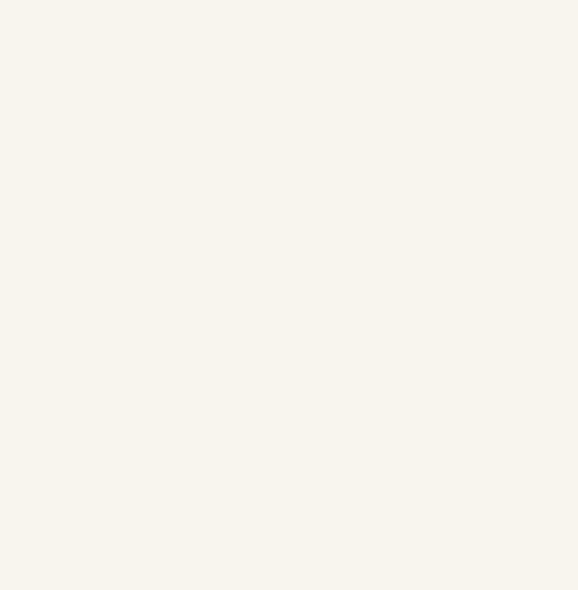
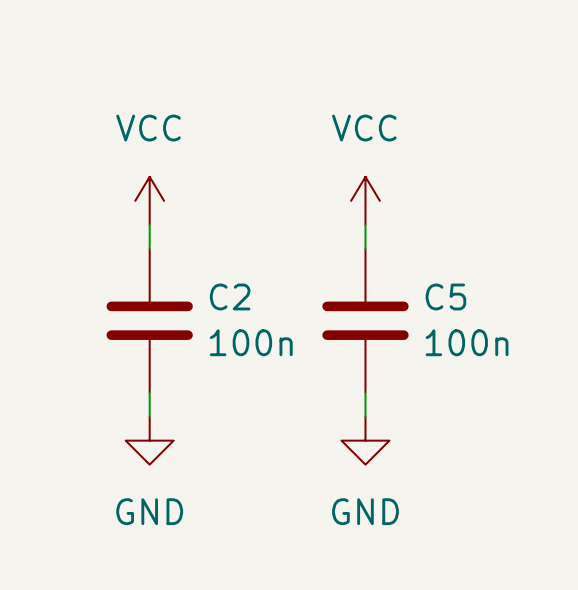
power symbol: none -> VCC (149, 200)
power symbol: none -> VCC (365, 200)
wire: none -> (149, 224) (149, 248)
wire: none -> (365, 224) (365, 248)
C2: none -> 100n (149, 320)
C5: none -> 100n (365, 320)
wire: none -> (149, 392) (149, 416)
wire: none -> (365, 392) (365, 416)
power symbol: none -> GND (149, 440)
power symbol: none -> GND (365, 440)

